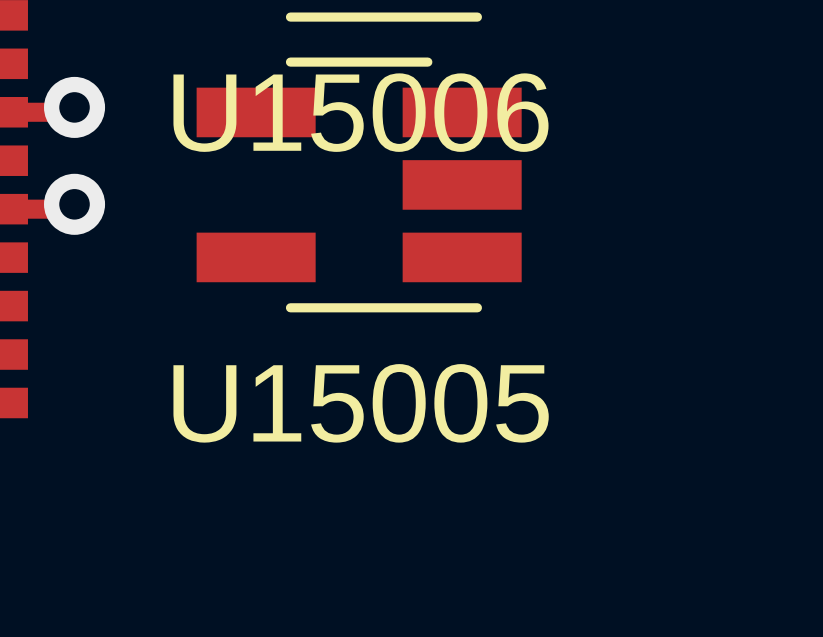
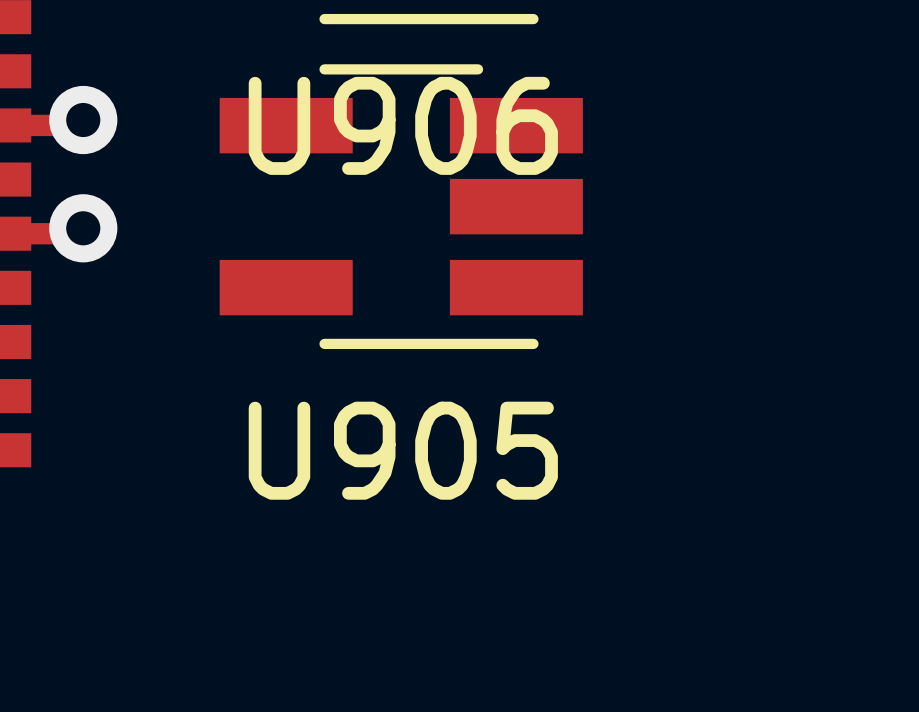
U15006 name: U15006 (360, 112) -> U906 (403, 125)
U15005 name: U15005 (361, 403) -> U905 (403, 450)

